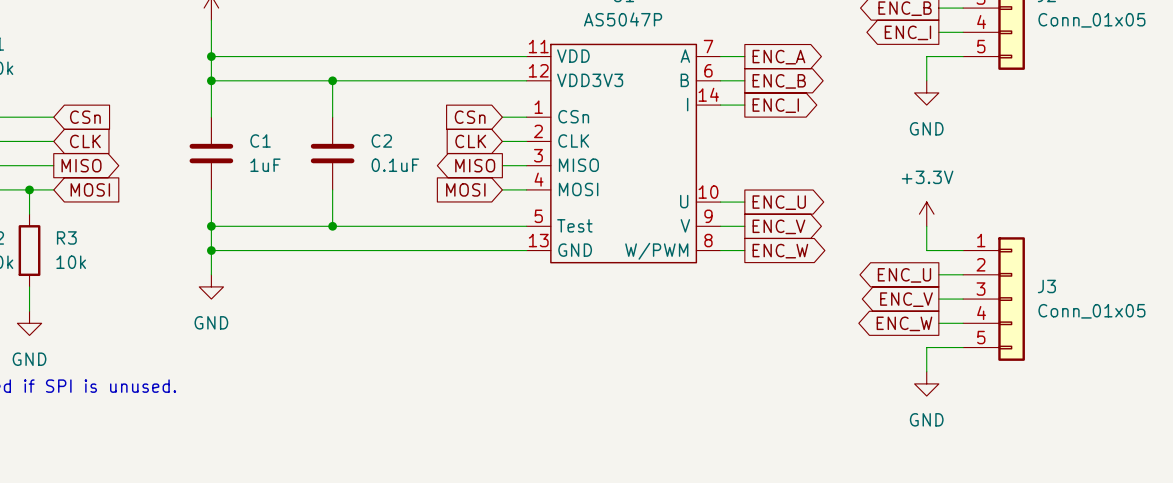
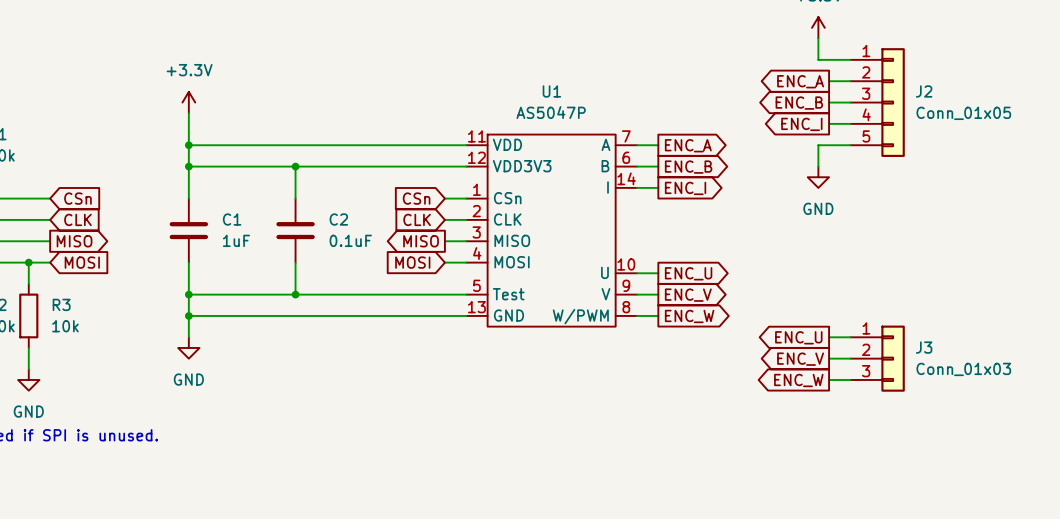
power symbol: +3.3V (926, 214) -> none
wire: (926, 226) (926, 250) (963, 250) -> none
J3 symbol: [963, 237, 1025, 361] -> [850, 325, 905, 392]
J3 value: Conn_01x05 (1091, 311) -> Conn_01x03 (963, 369)
wire: (963, 347) (926, 347) (926, 371) -> none
power symbol: GND (926, 383) -> none

